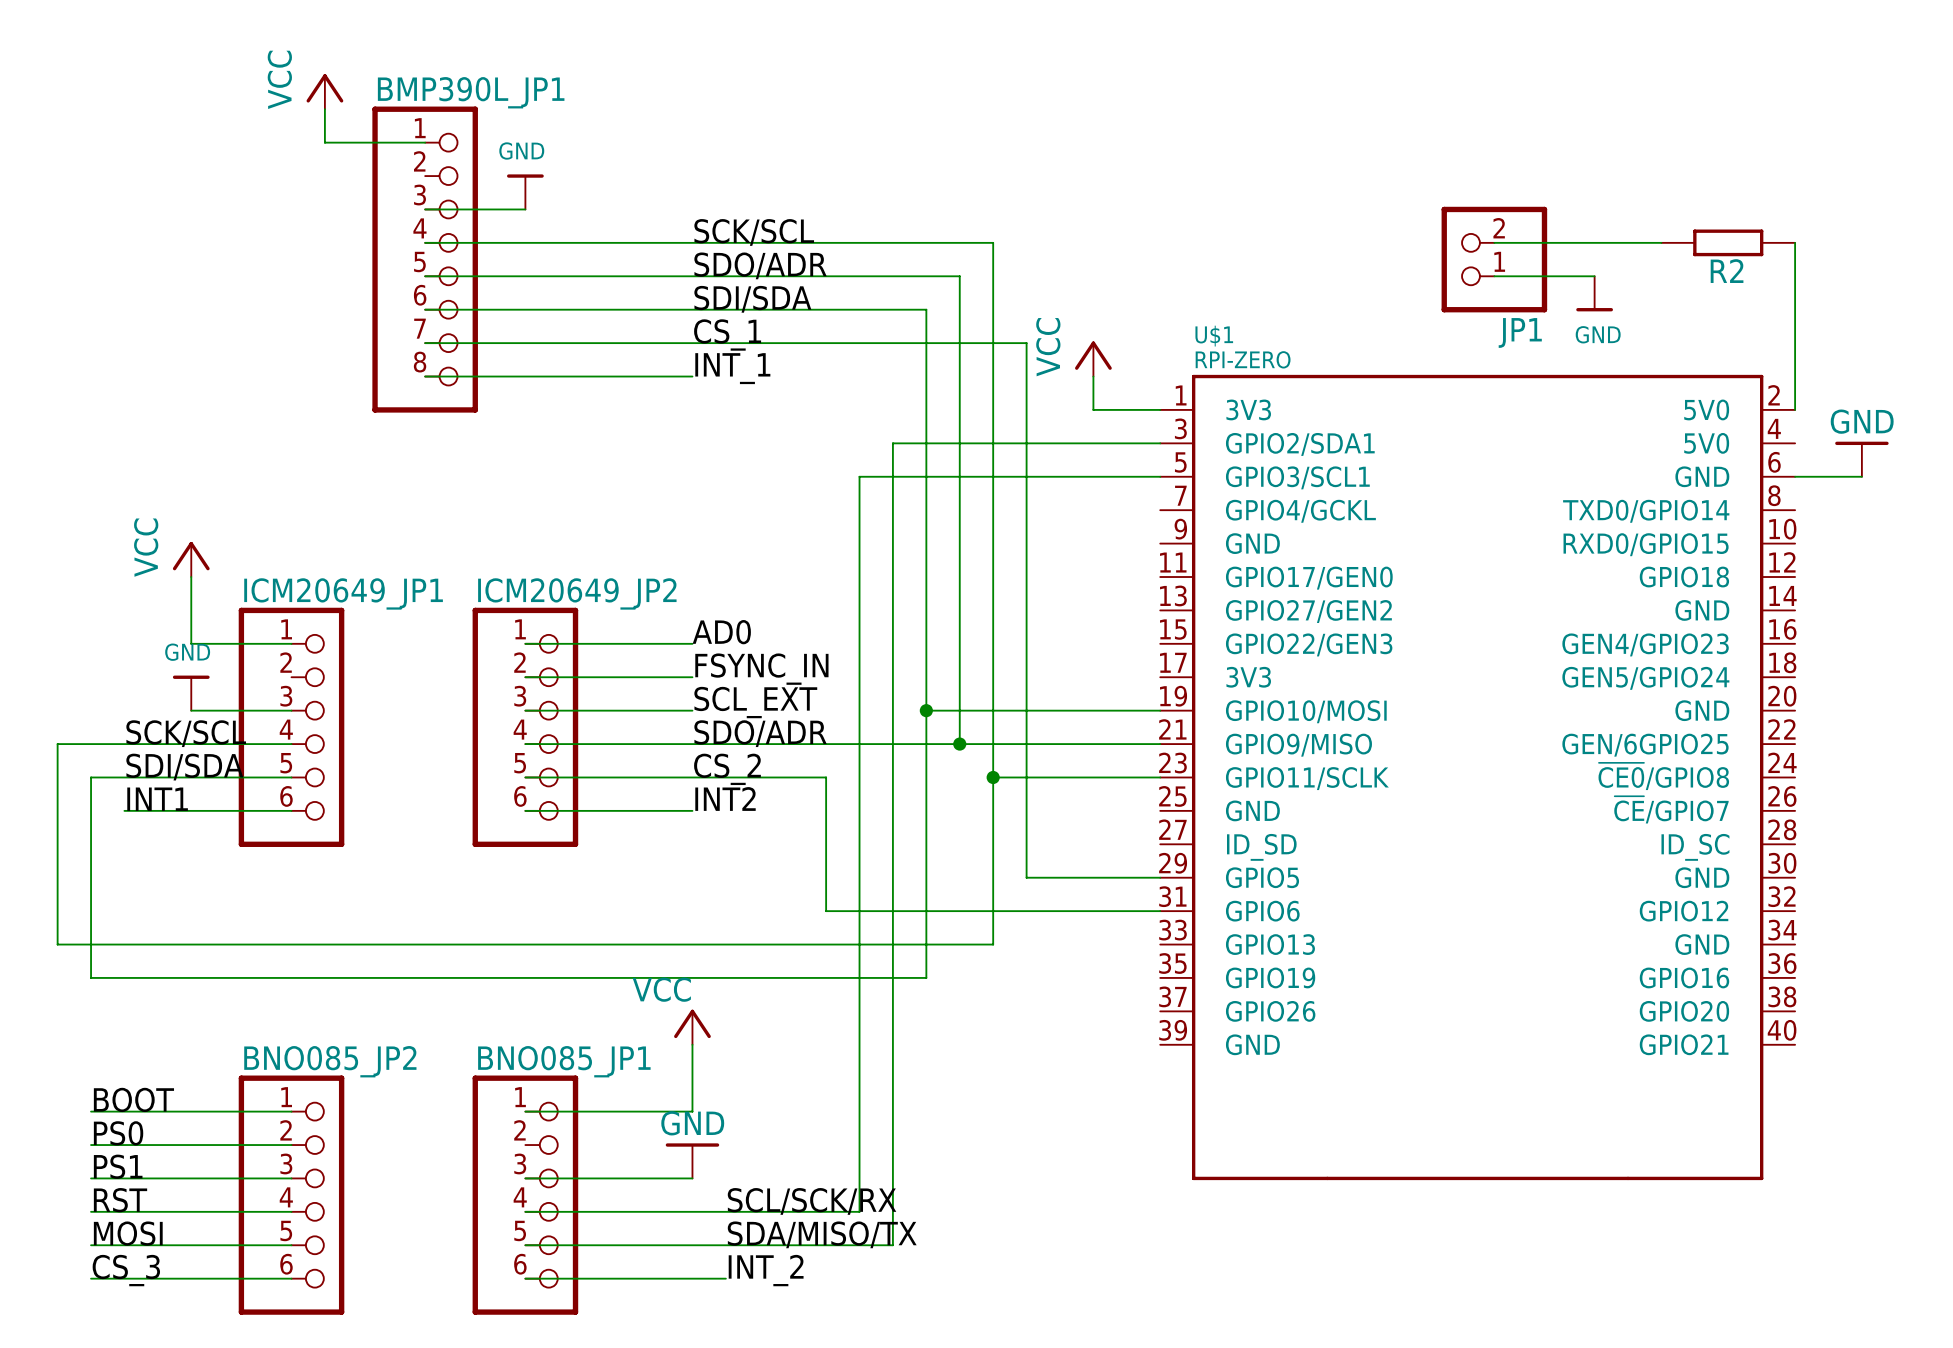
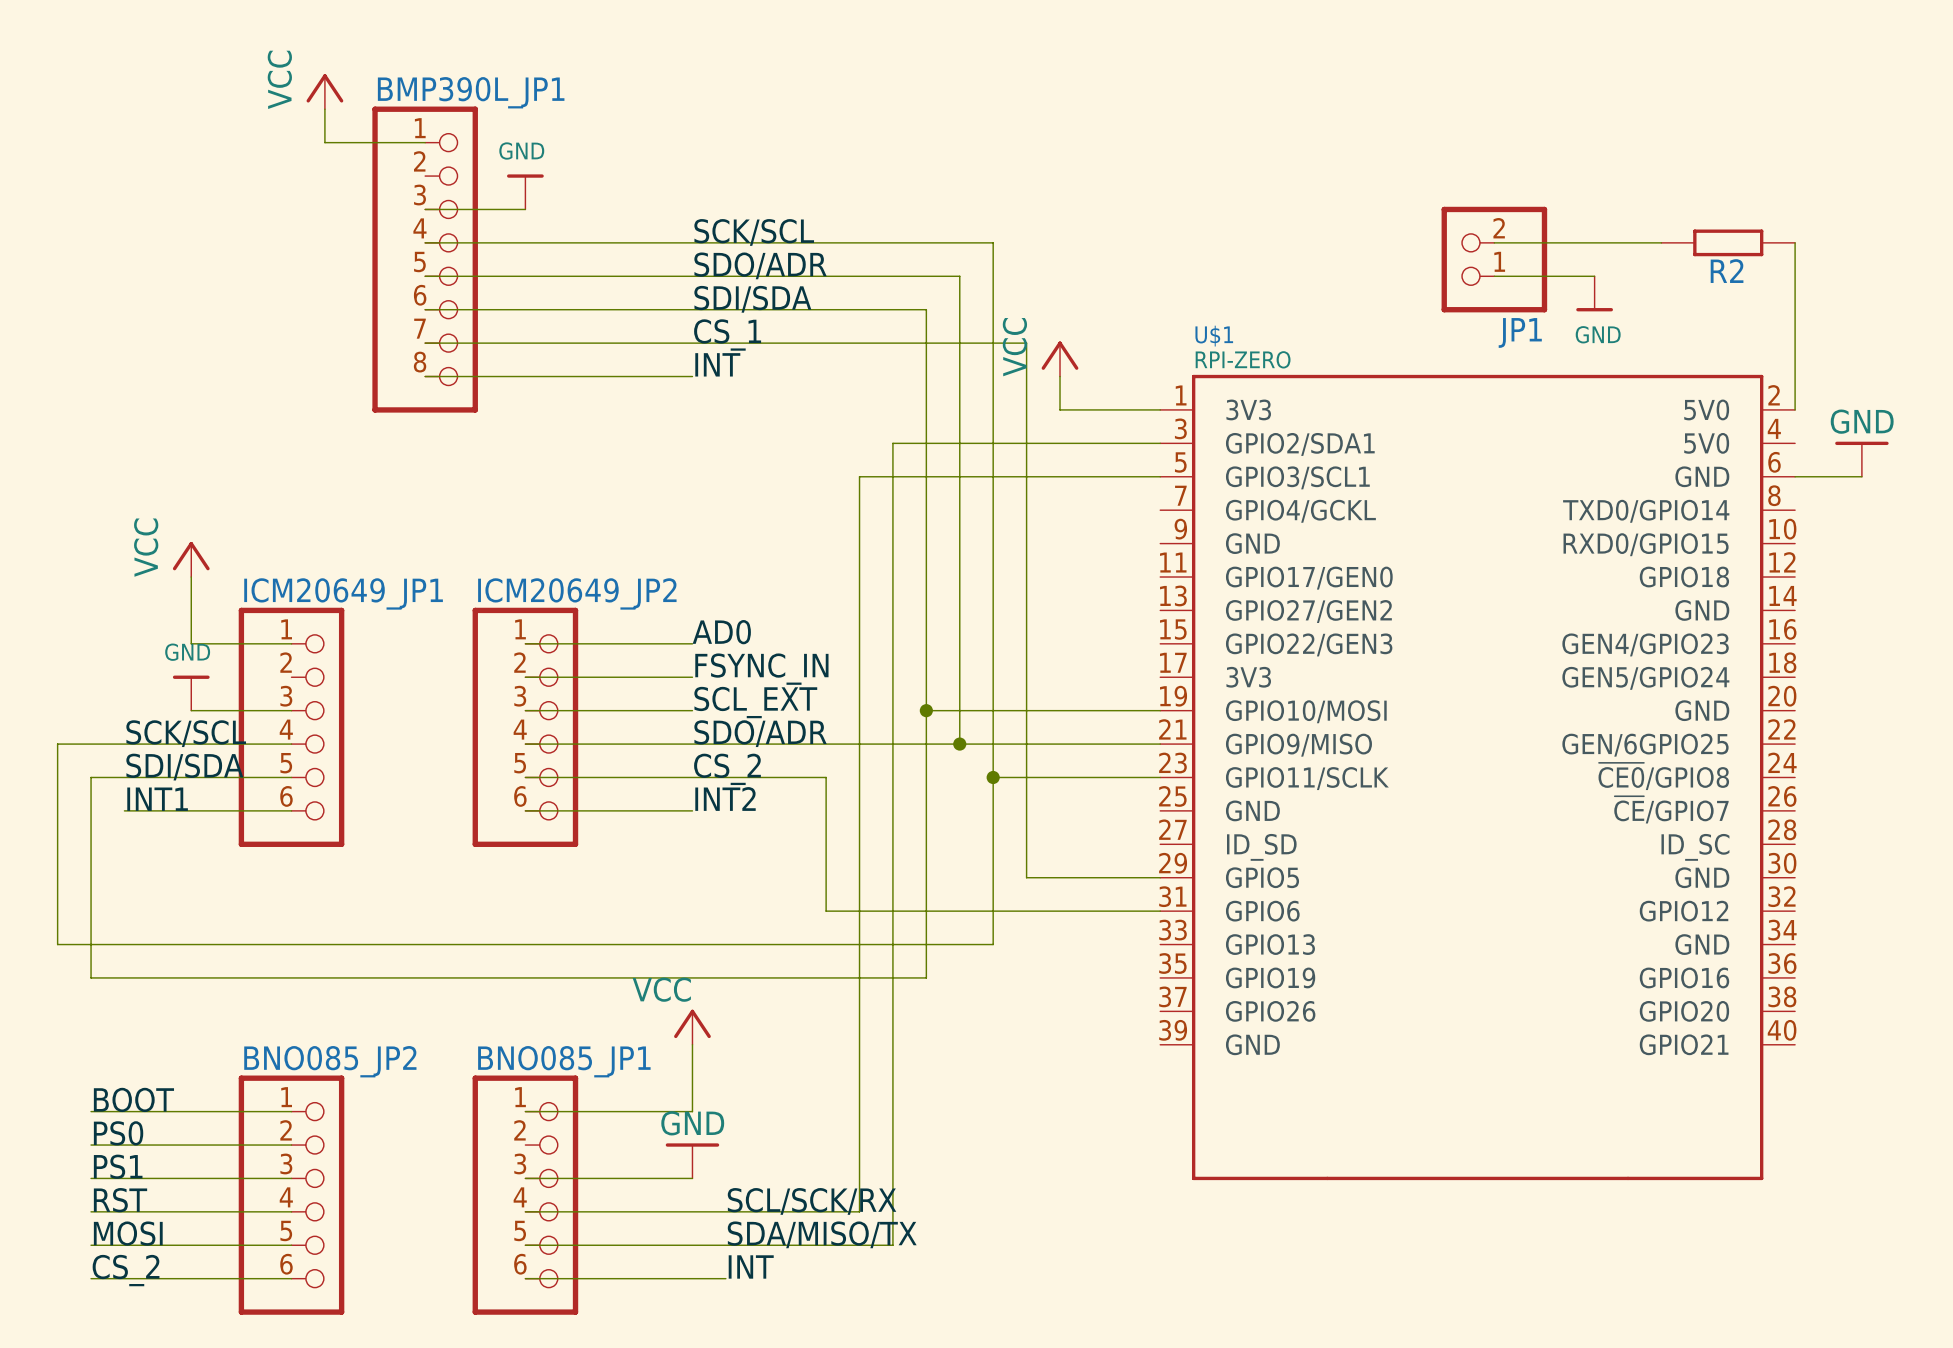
power symbol position: VCC (1093, 358) -> VCC (1060, 358)
label: INT_1 (732, 368) -> INT (717, 364)
wire: (1093, 376) (1093, 409) -> (1060, 376) (1060, 409) (1093, 409)
label: CS_3 (126, 1270) -> CS_2 (126, 1270)
label: INT_2 (766, 1270) -> INT (751, 1266)

